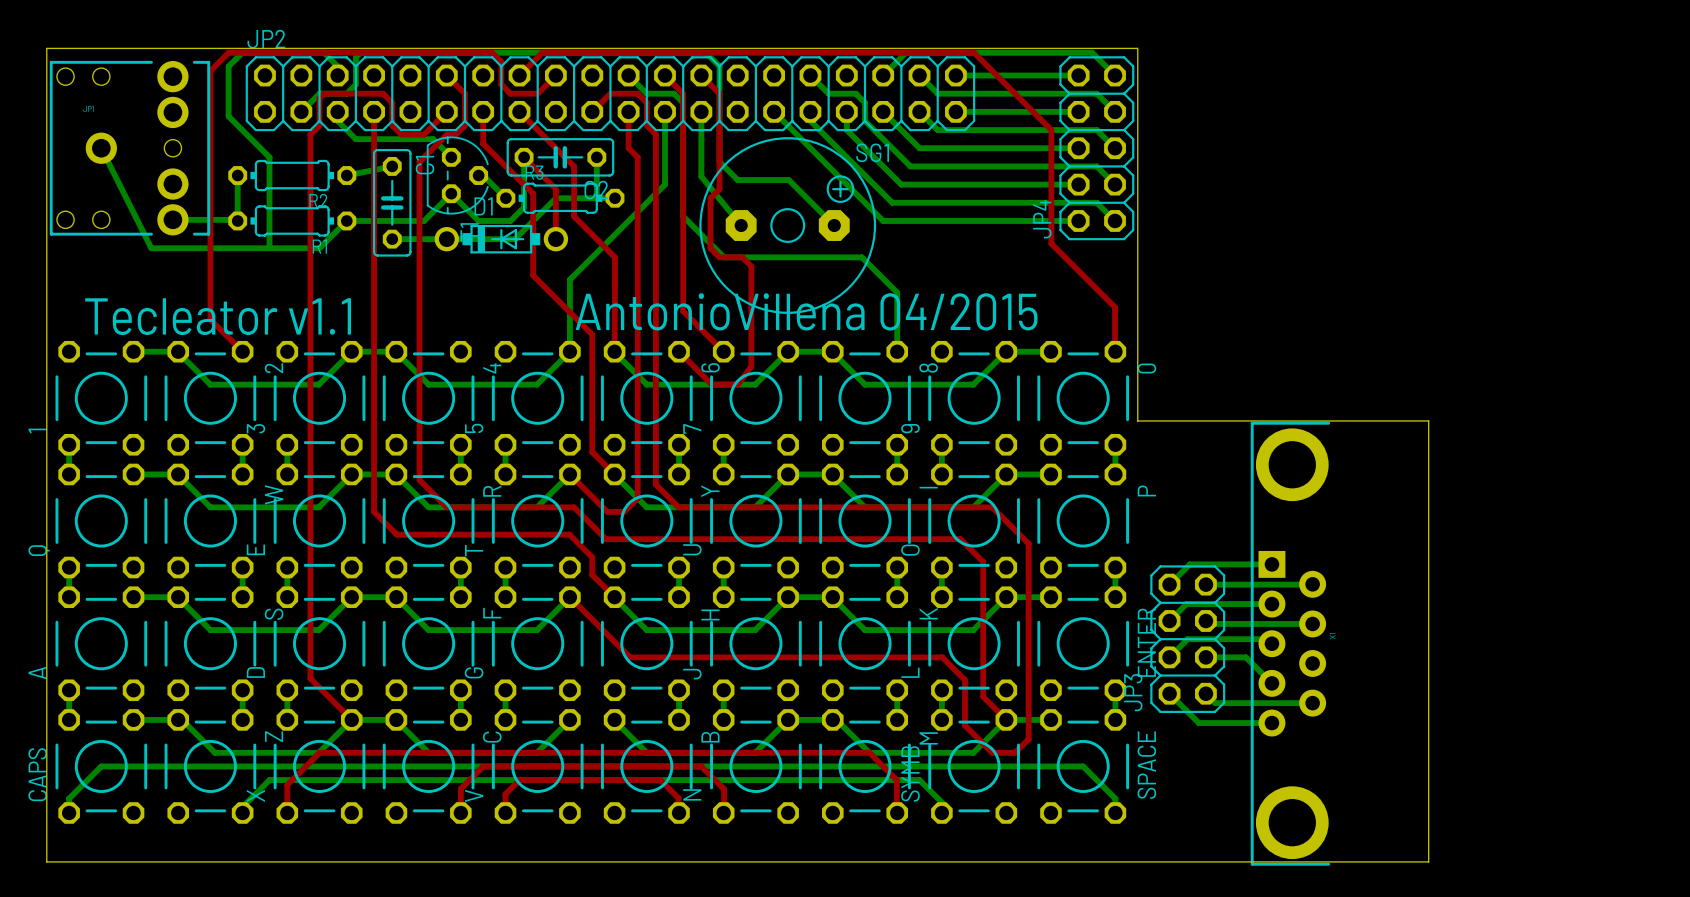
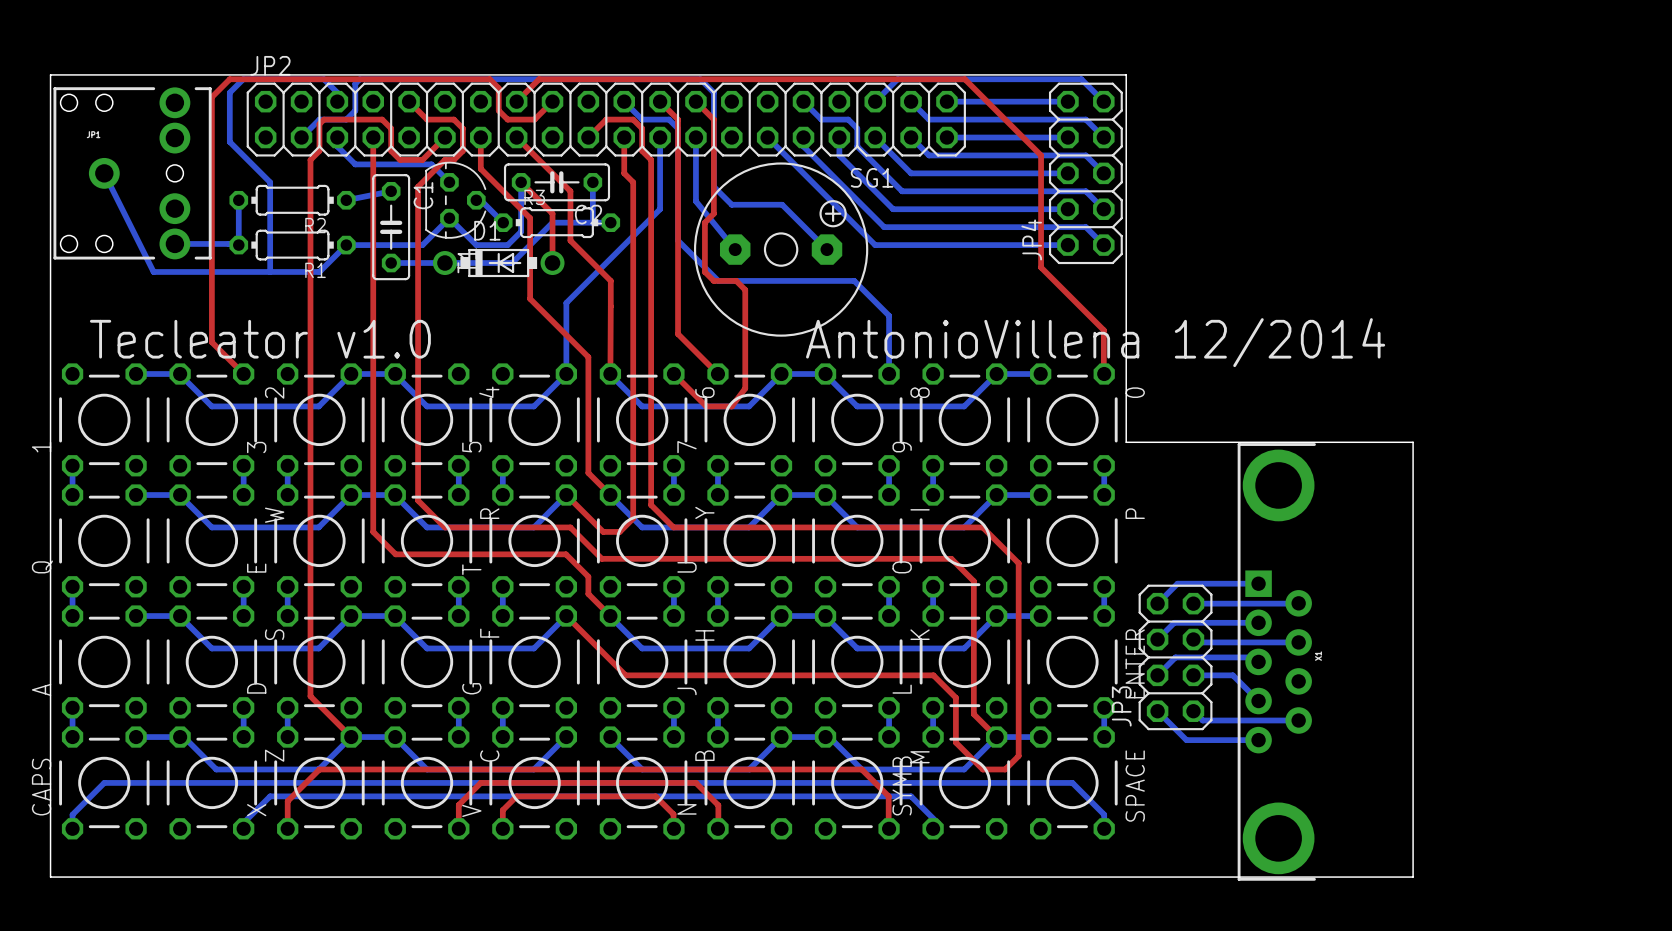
top track: (446, 75) (464, 93) (464, 102) -> (409, 101) (427, 119) (453, 119) (462, 128)
text: AntonioVillena 04/2015 (806, 311) -> none
text: Tecleator v1.1 (218, 316) -> Tecleator v1.0 AntonioVillena 12/2014 (737, 342)

